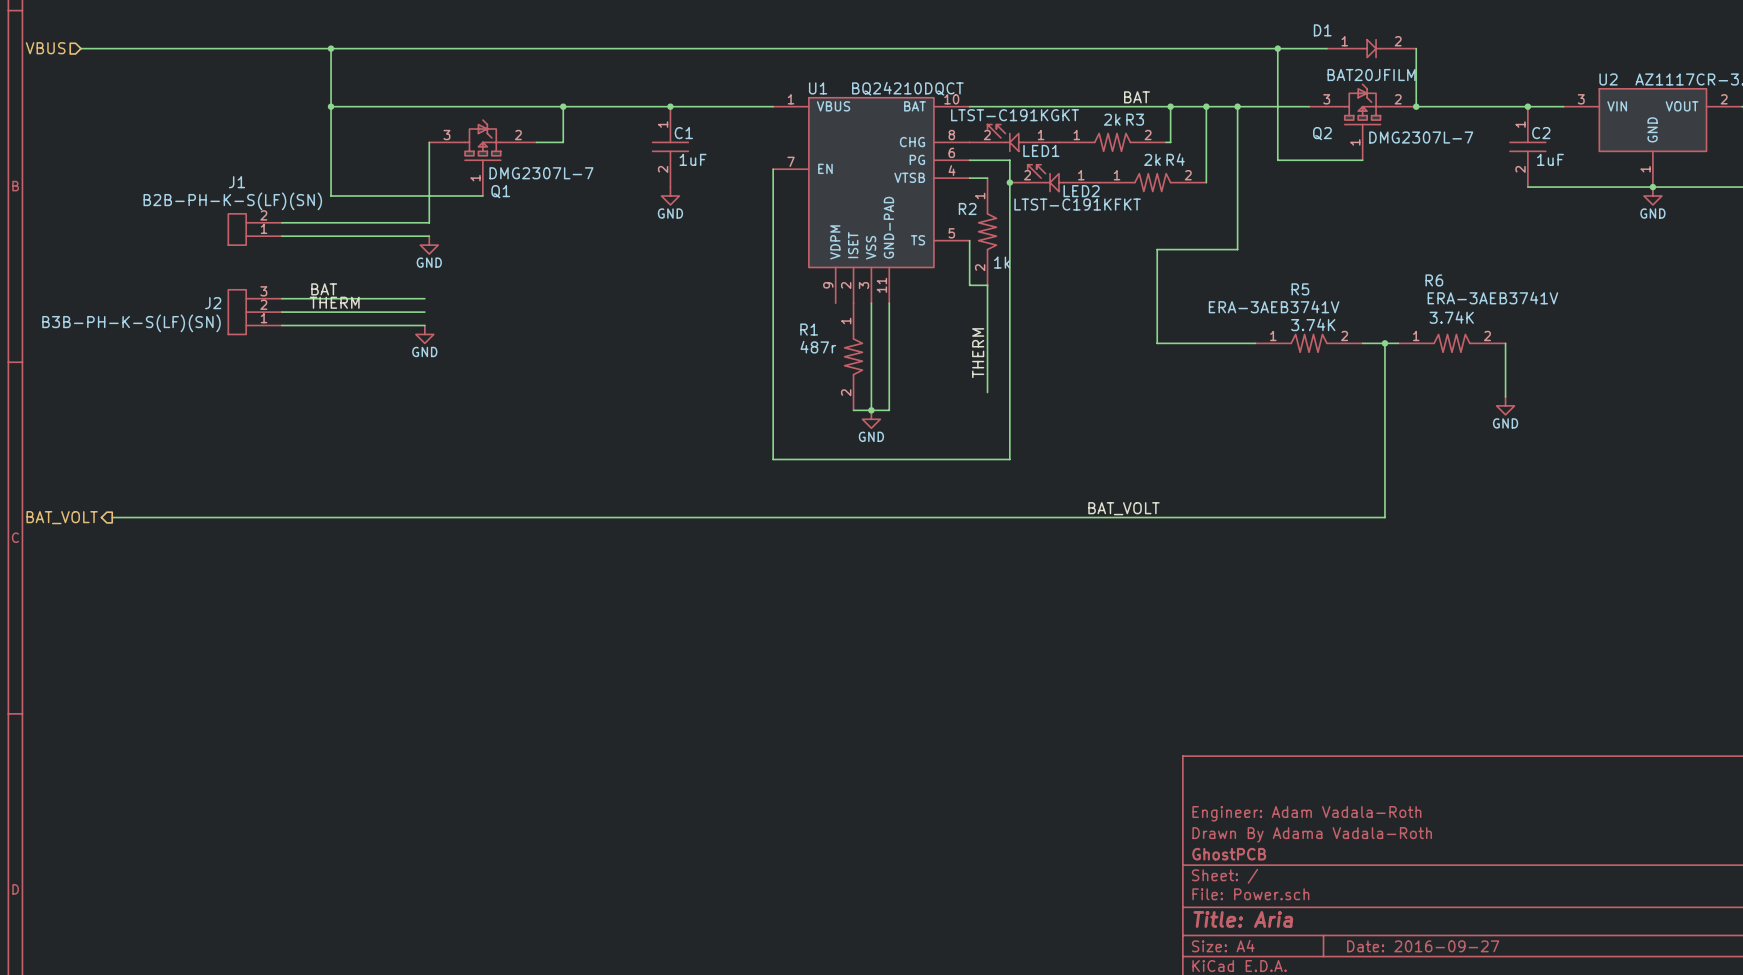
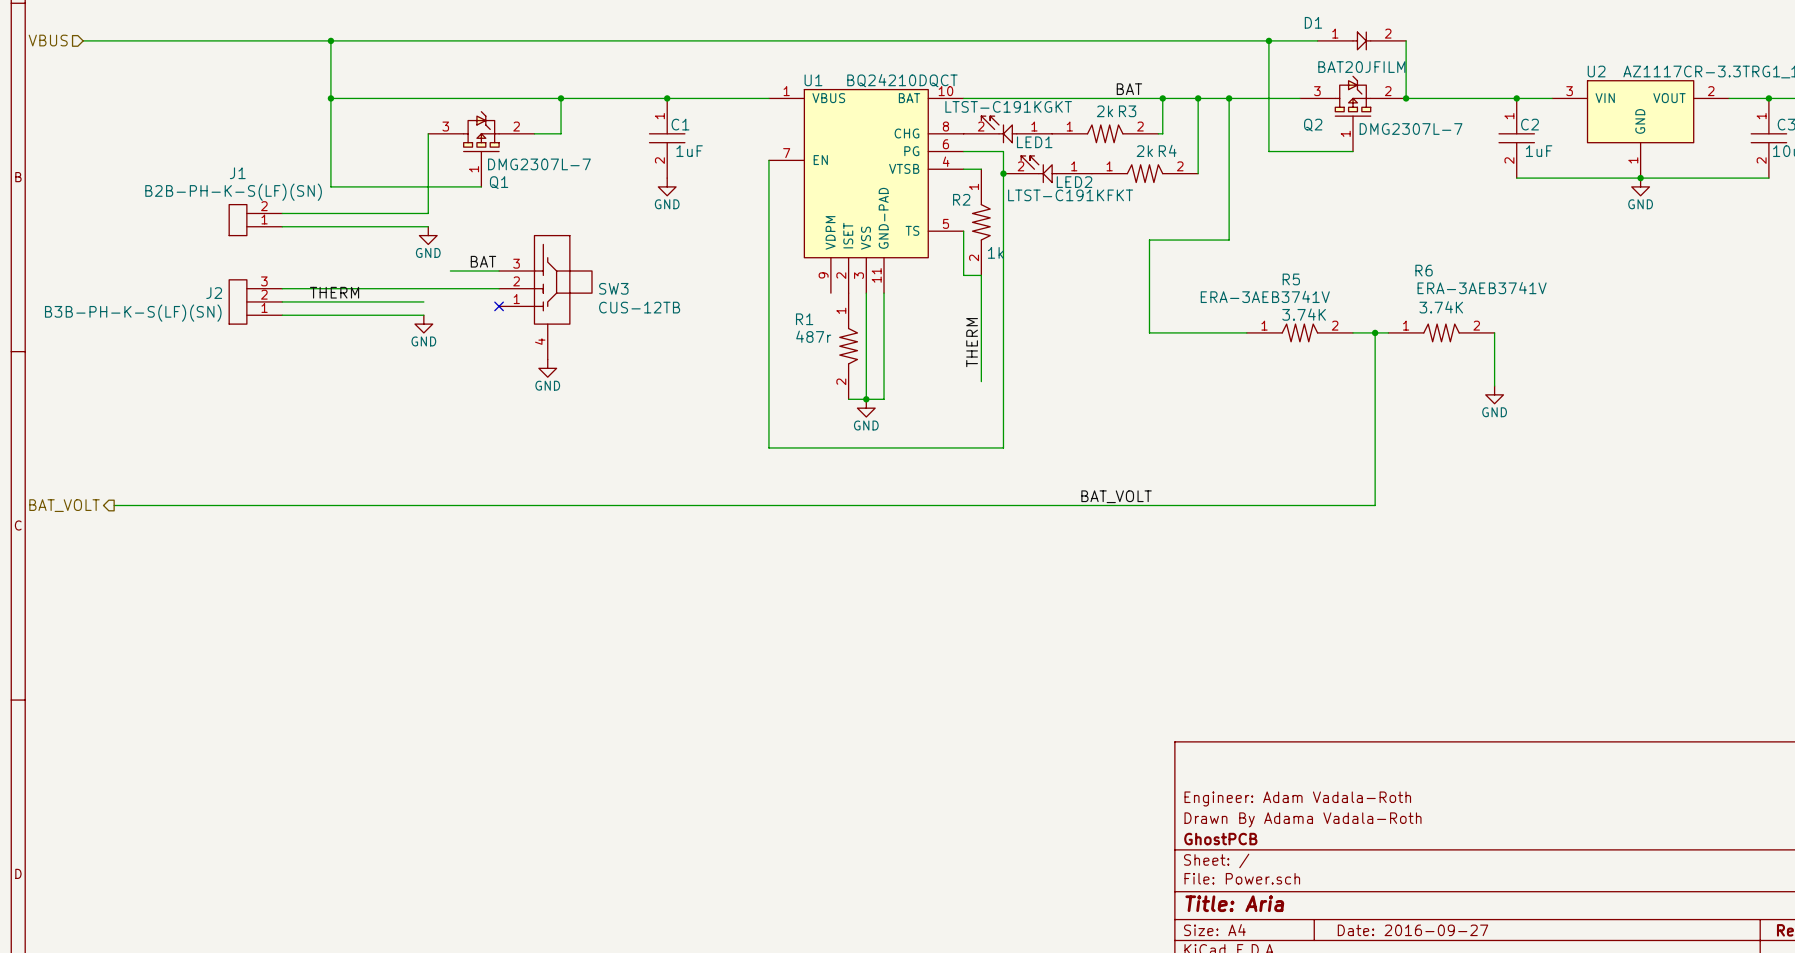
wire: none -> (450, 270) (499, 270)
label position: BAT (324, 289) -> BAT (483, 261)
wire: none -> (423, 288) (499, 288)
SW3: none -> CUS-12TB (545, 297)
no-connect mark: none -> (499, 306)
power symbol: none -> GND (547, 368)

